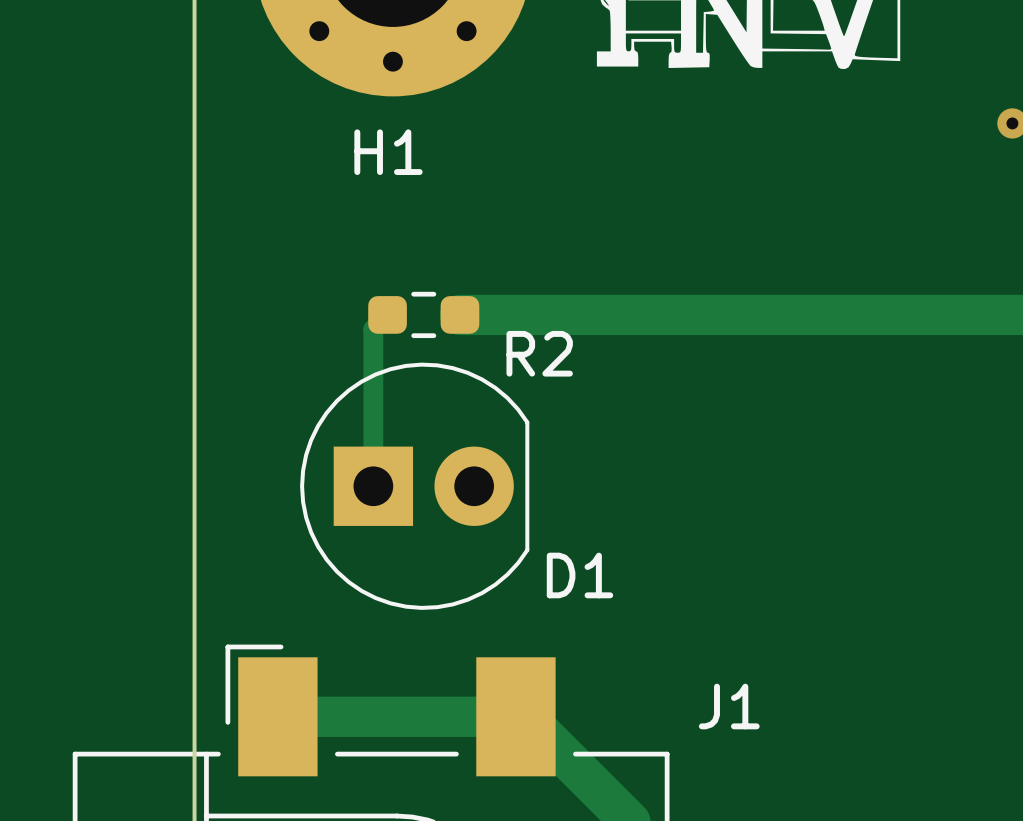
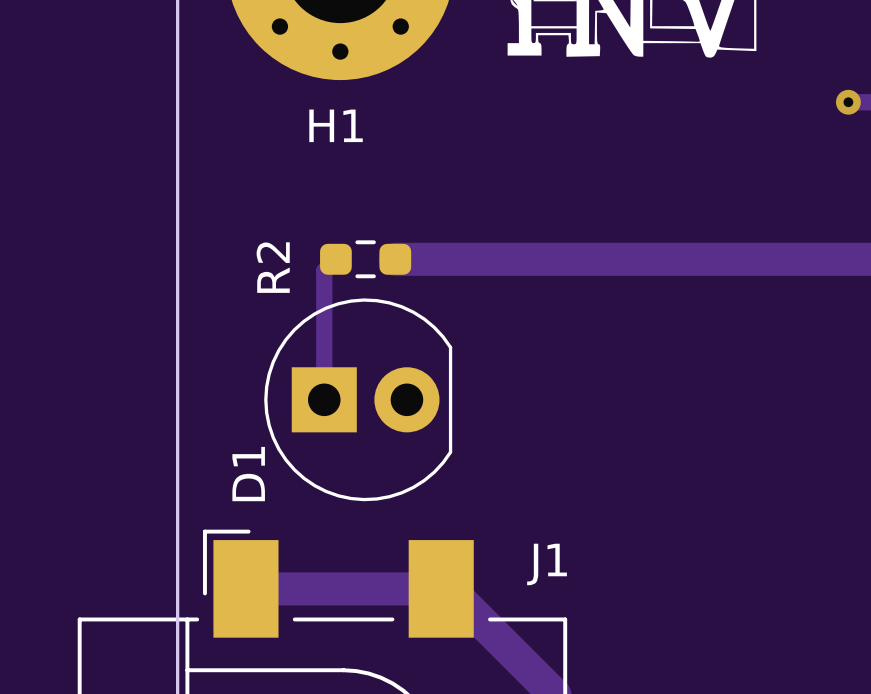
R2 name rotation: 0° (539, 353) -> 90° counterclockwise (273, 267)
R2 name position: R2 (539, 353) -> R2 (273, 267)
D1 name rotation: 0° (579, 575) -> 90° counterclockwise (248, 474)
D1 name position: D1 (579, 575) -> D1 (248, 474)
J1 name position: J1 (729, 706) -> J1 (547, 564)

